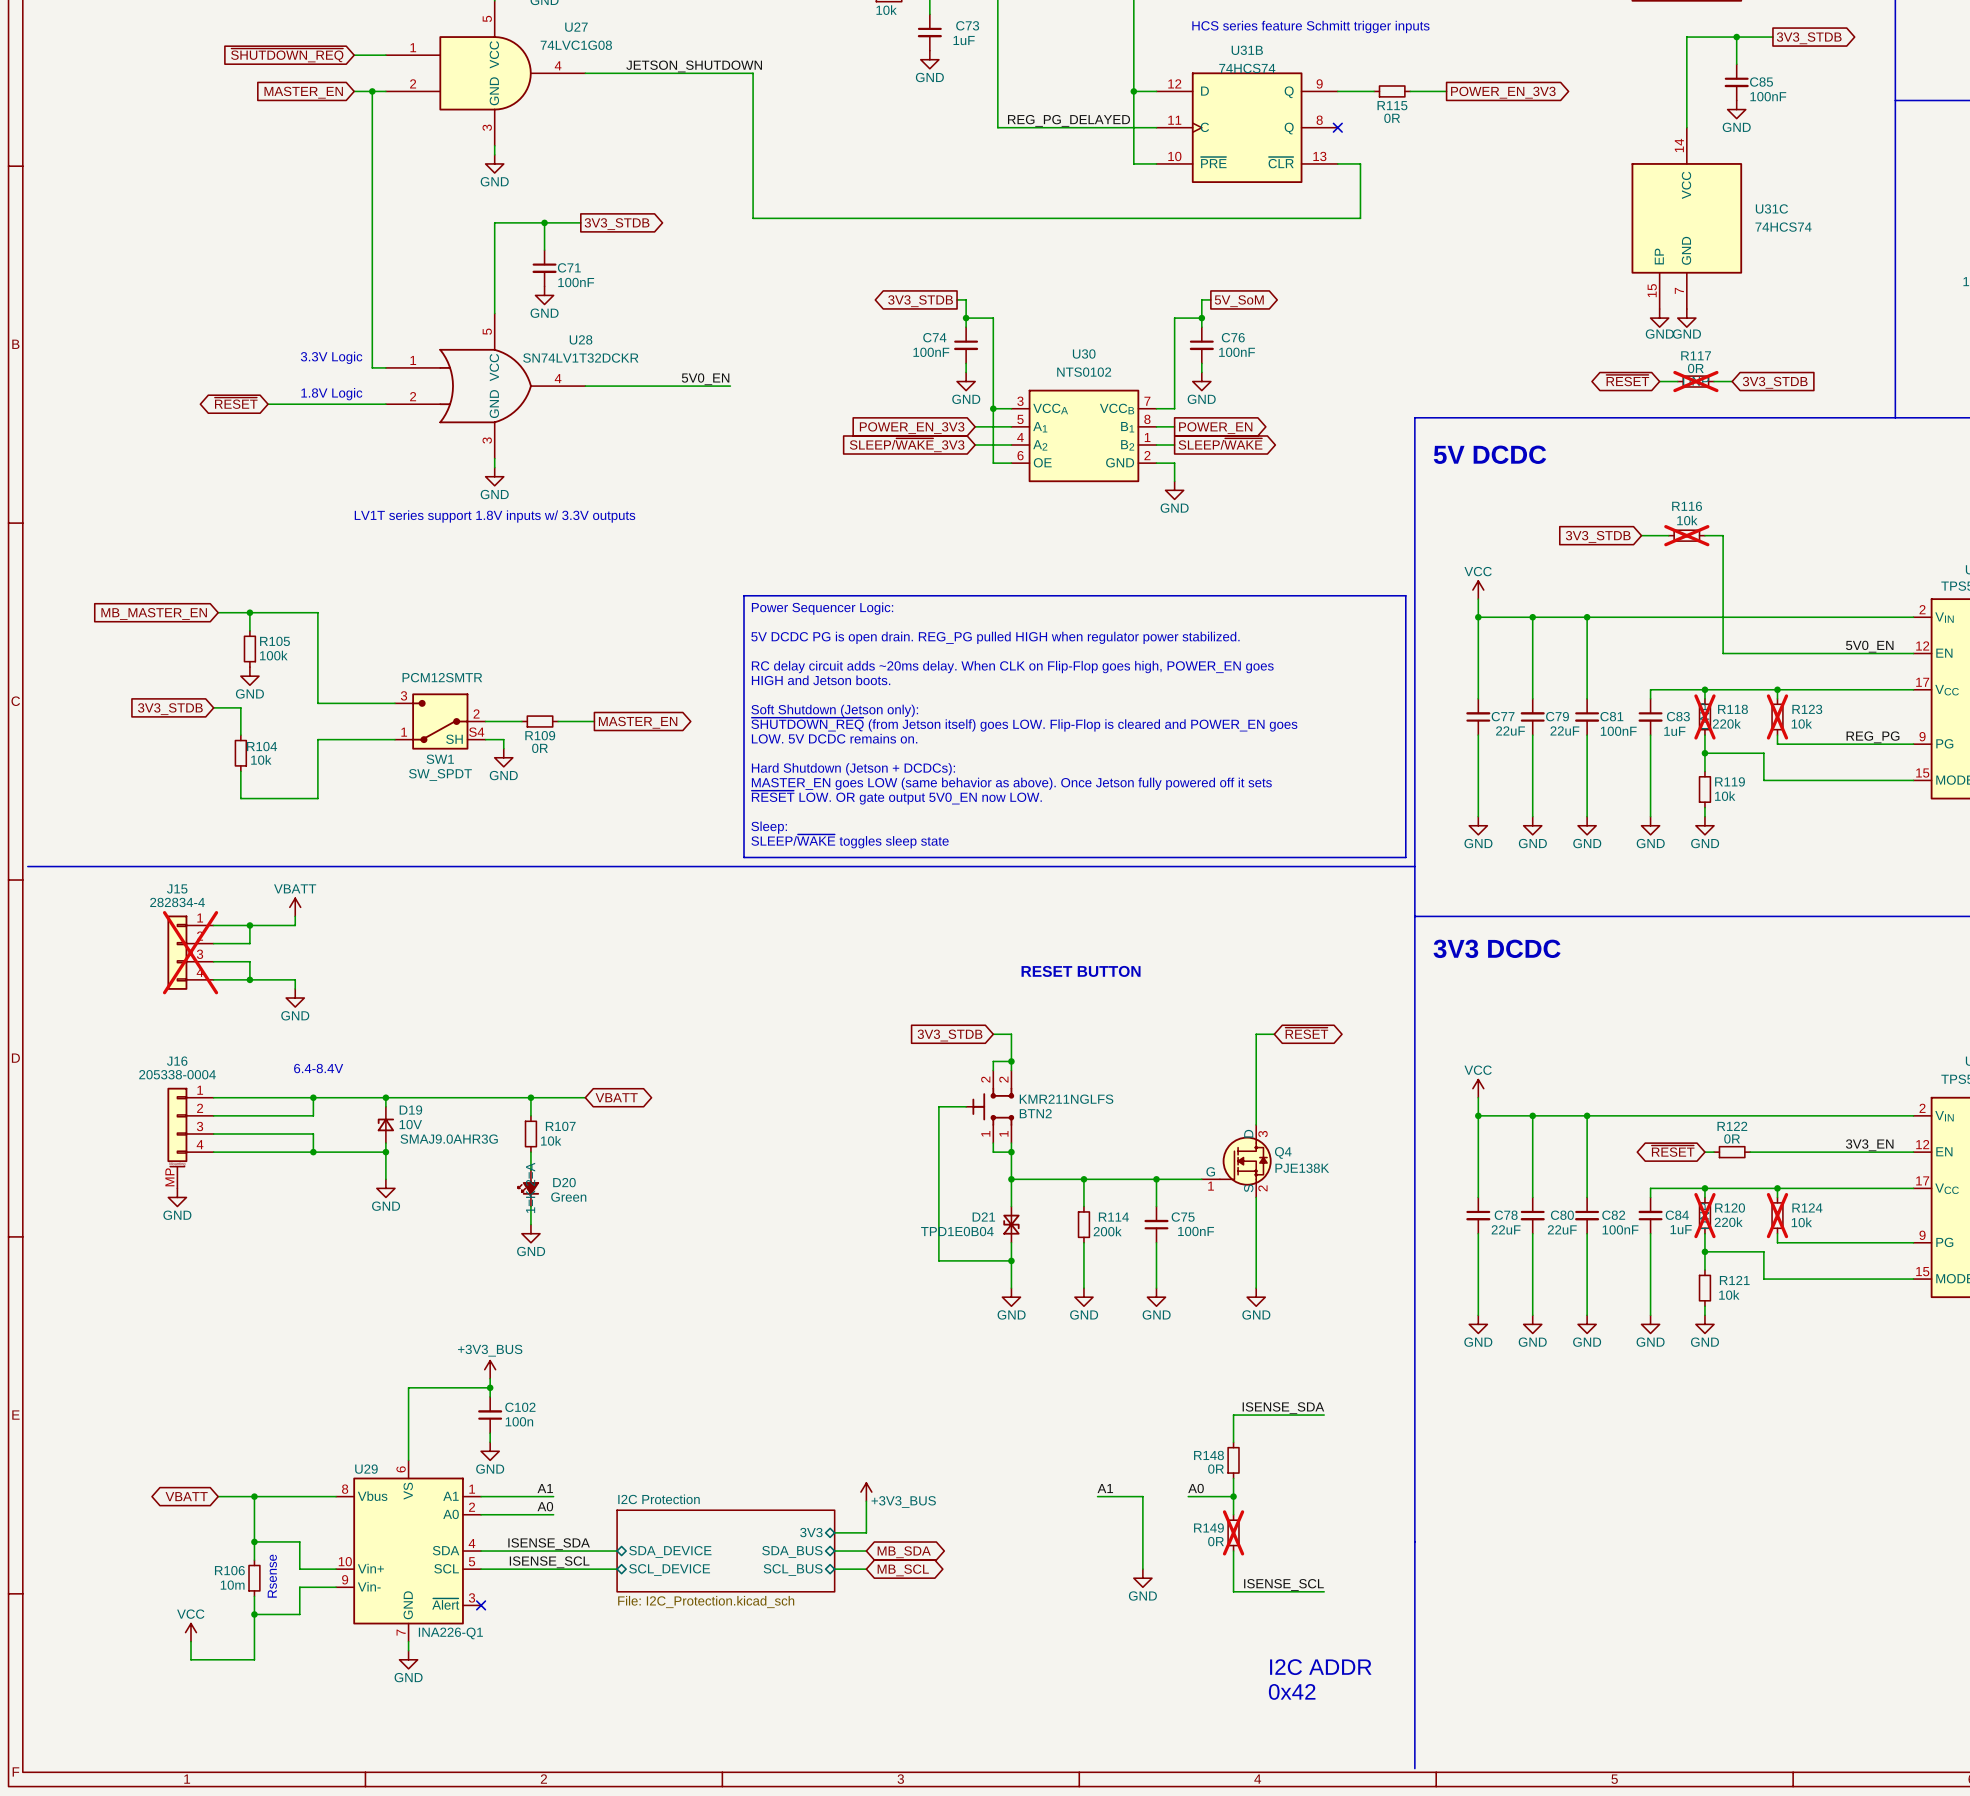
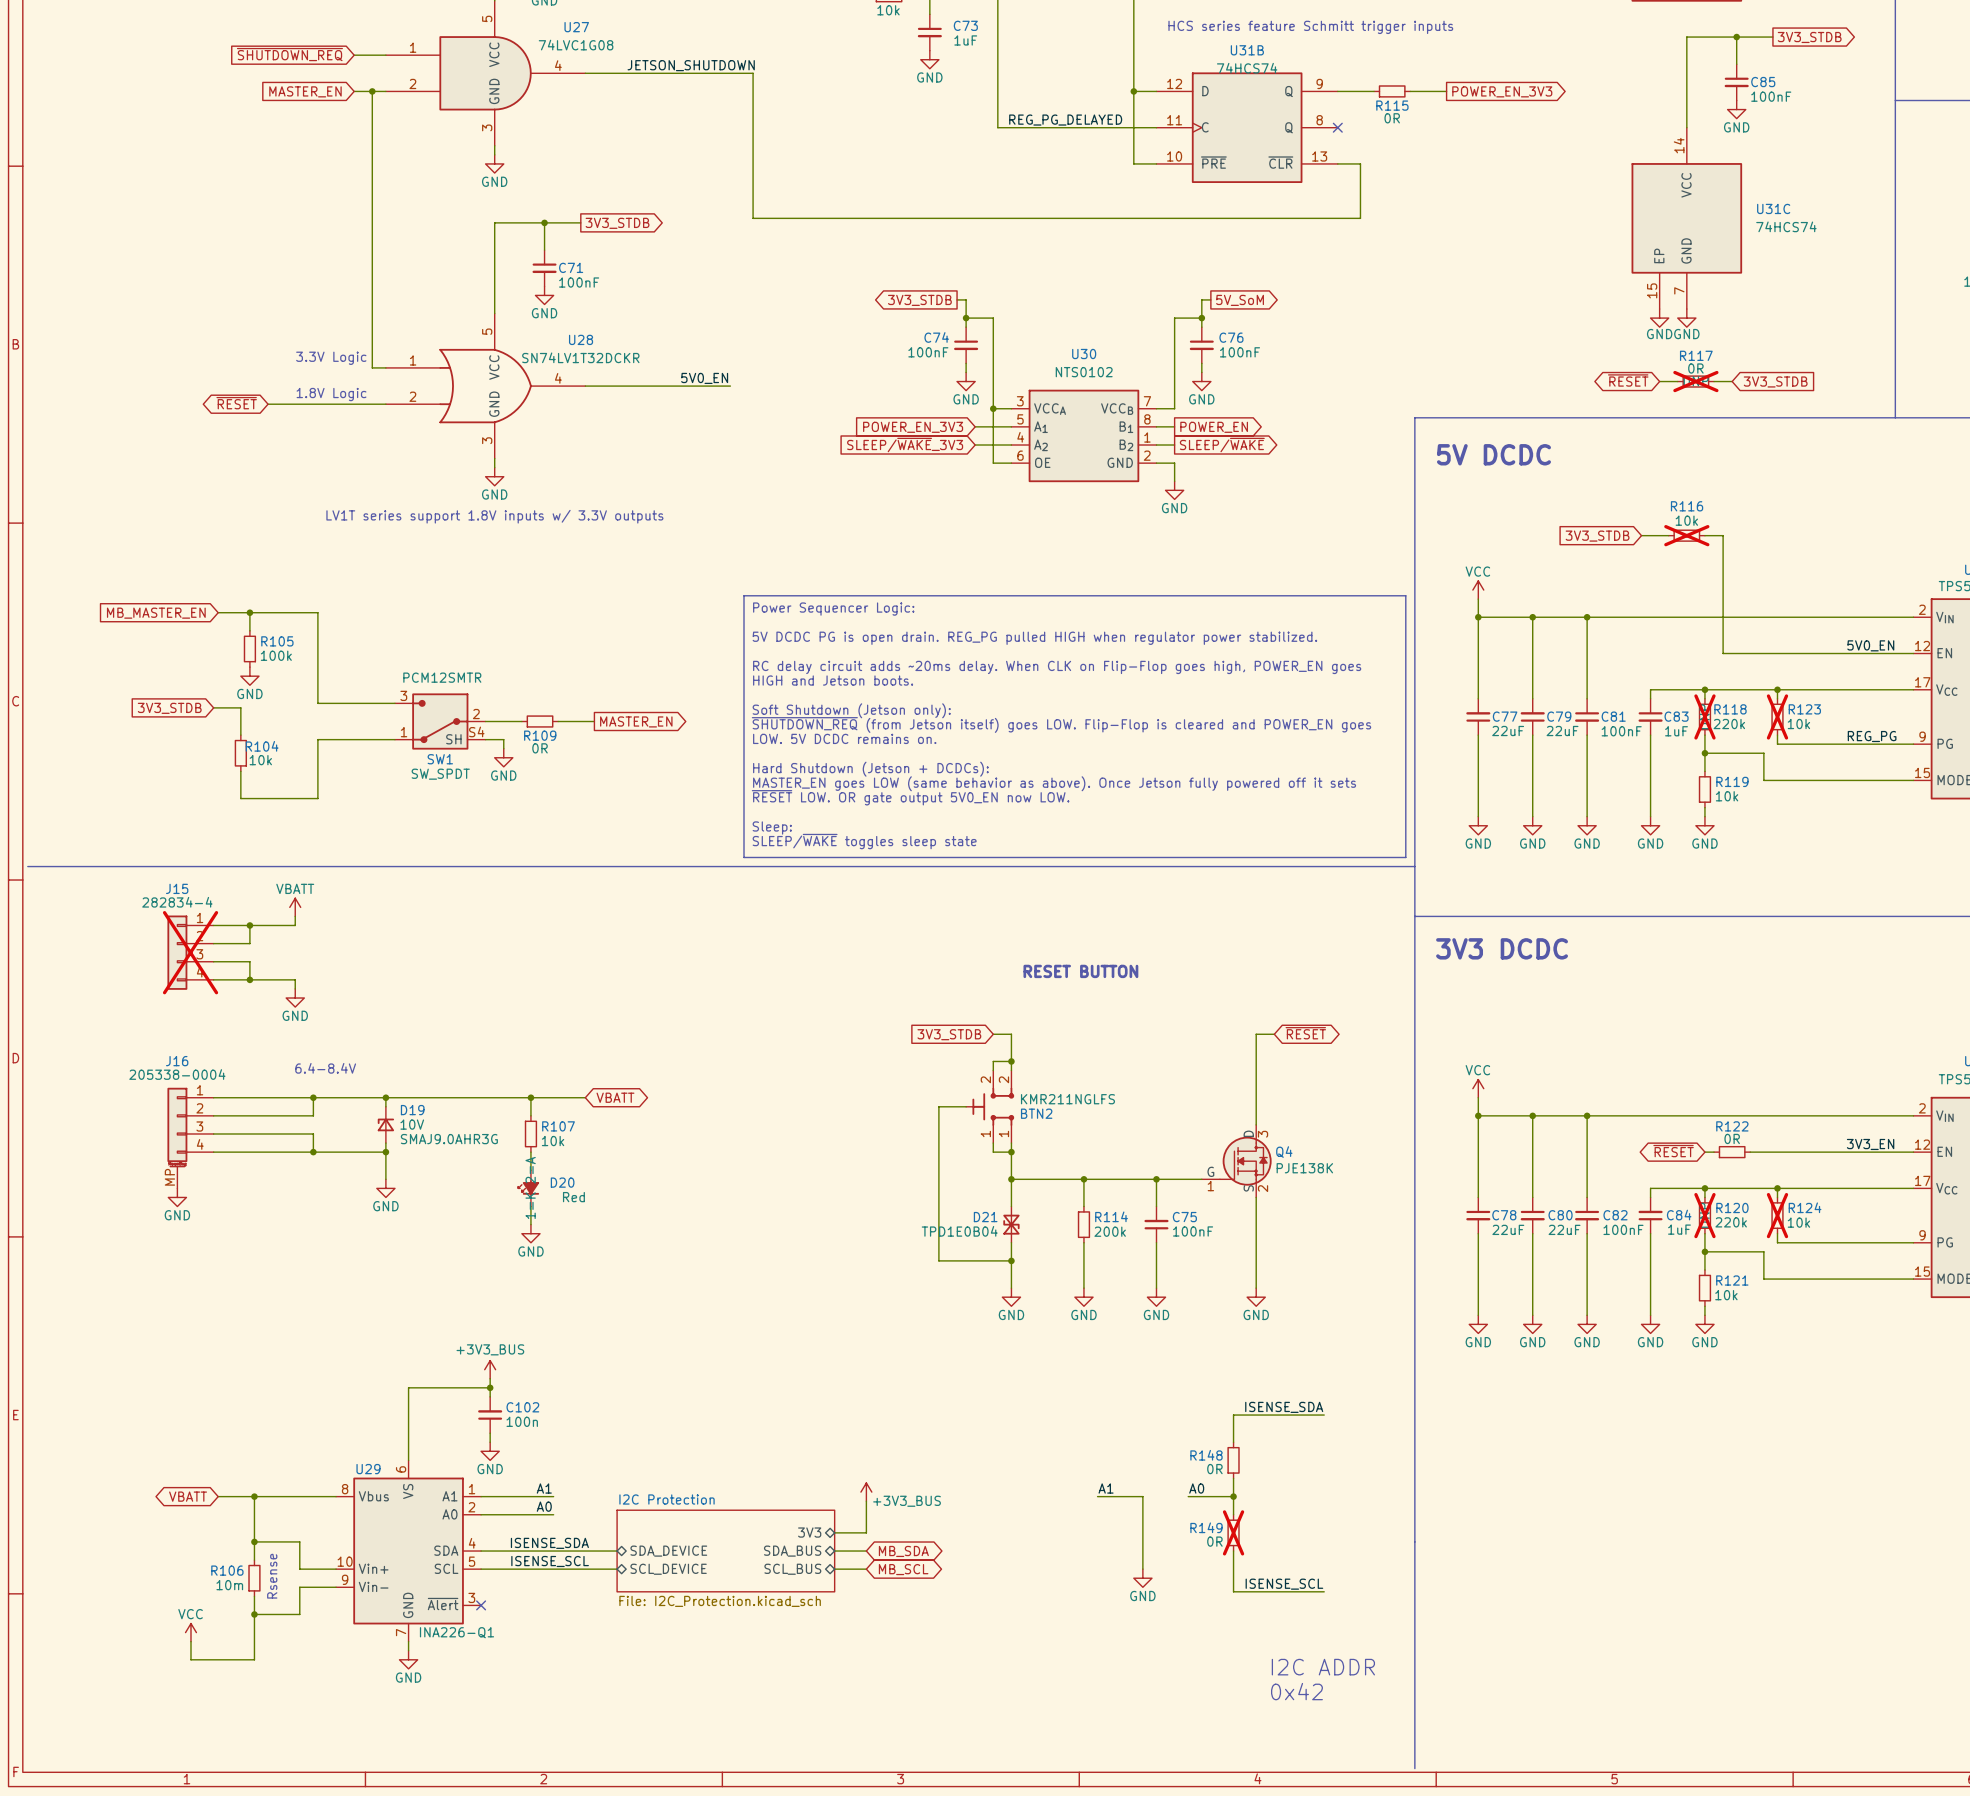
D20 text: Green (568, 1197) -> Red (573, 1197)

